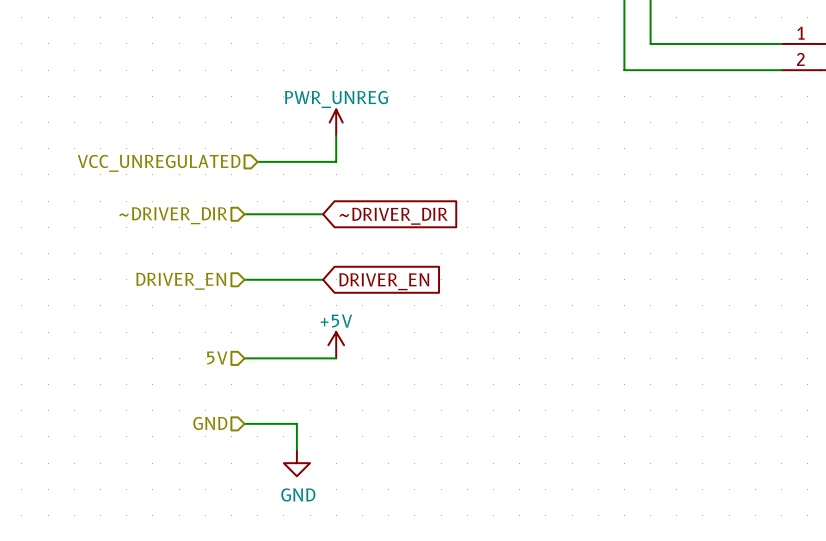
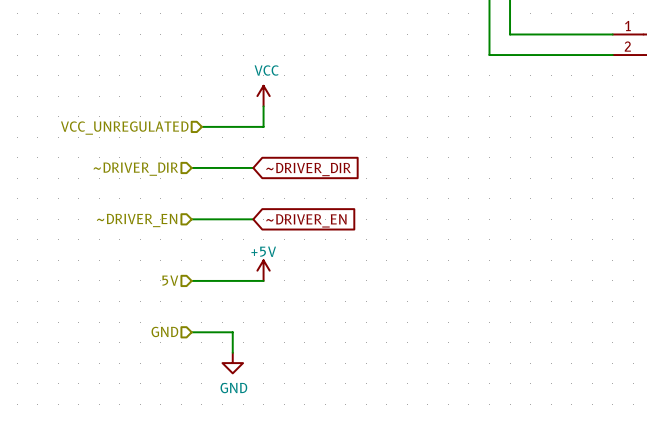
power symbol: PWR_UNREG (336, 122) -> VCC (263, 96)
hierarchical label: DRIVER_EN (181, 281) -> ~DRIVER_EN (137, 220)
global label: DRIVER_EN (384, 281) -> ~DRIVER_EN (306, 220)

